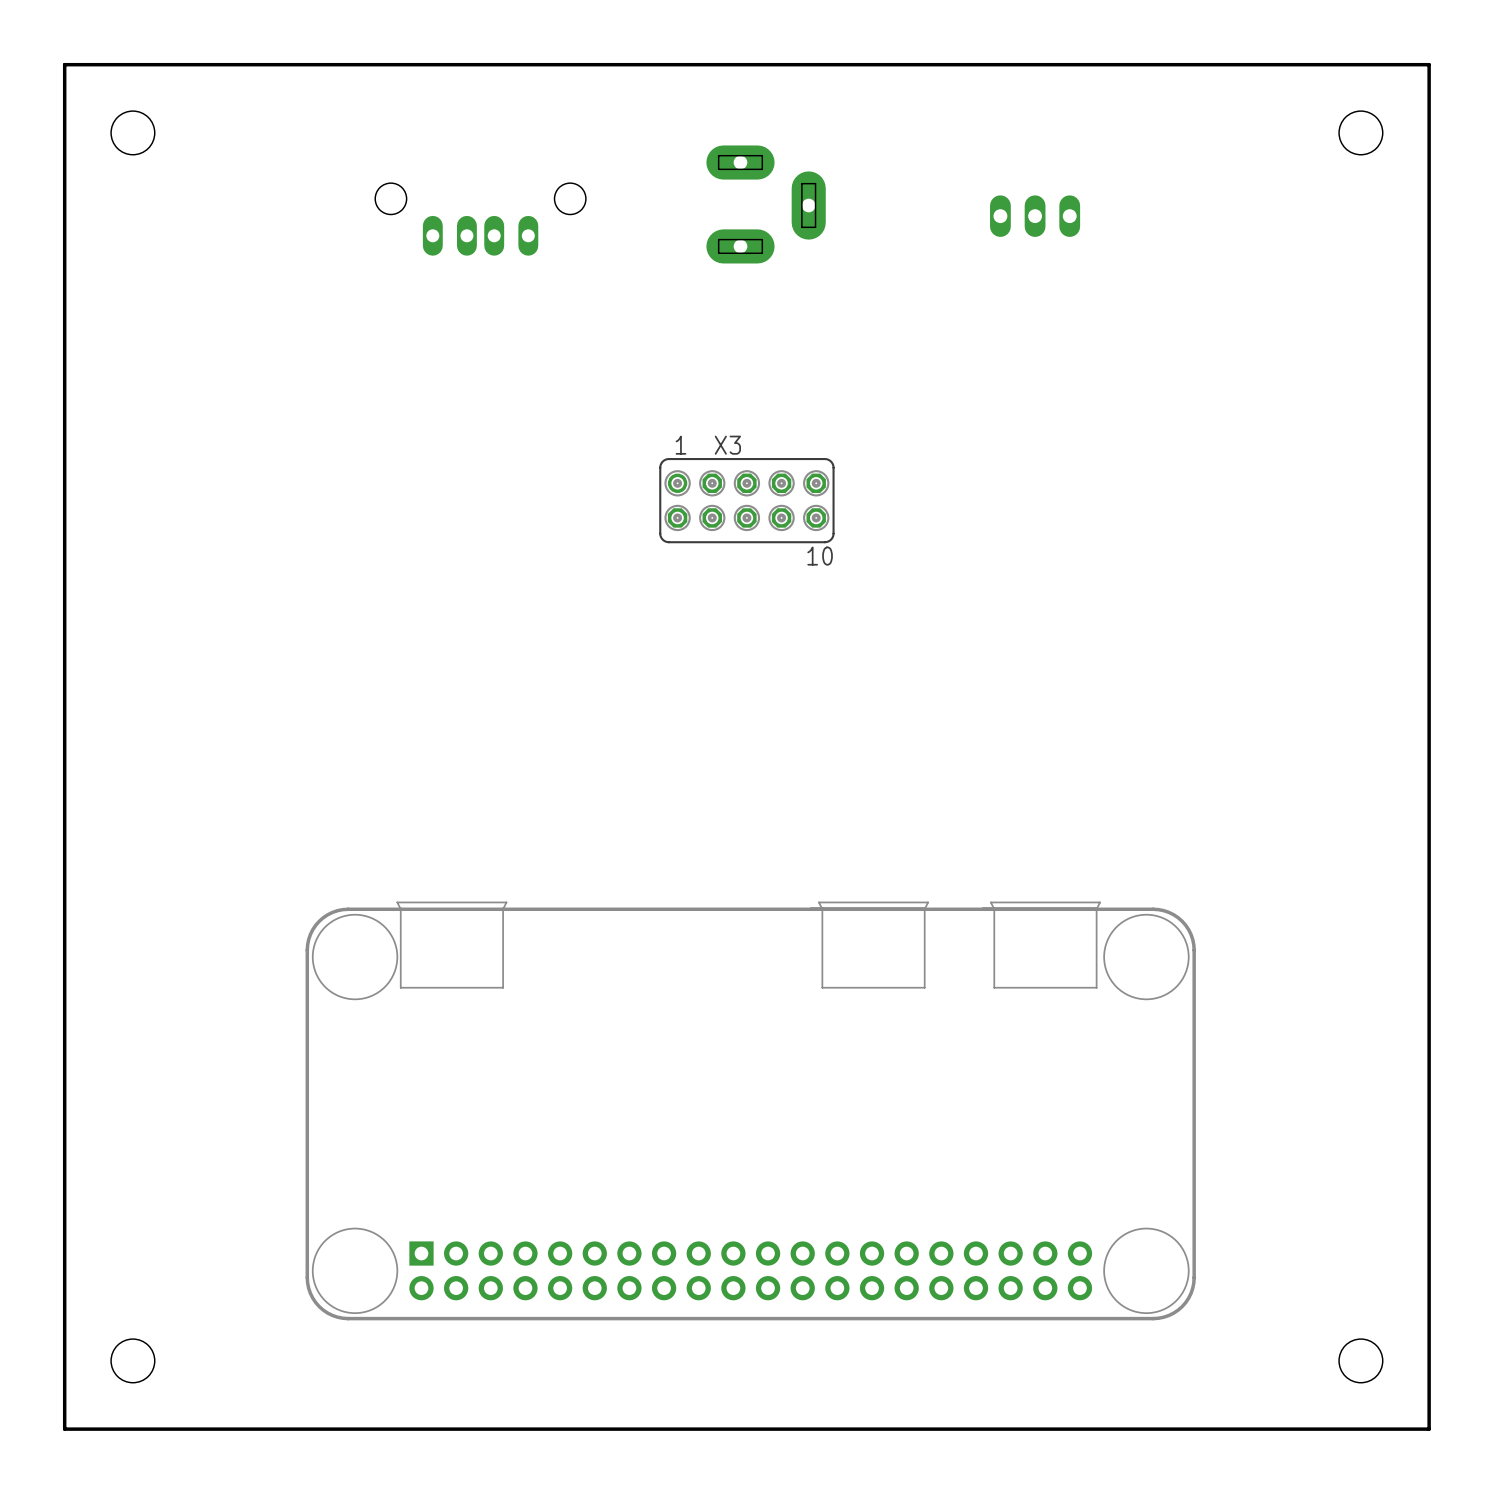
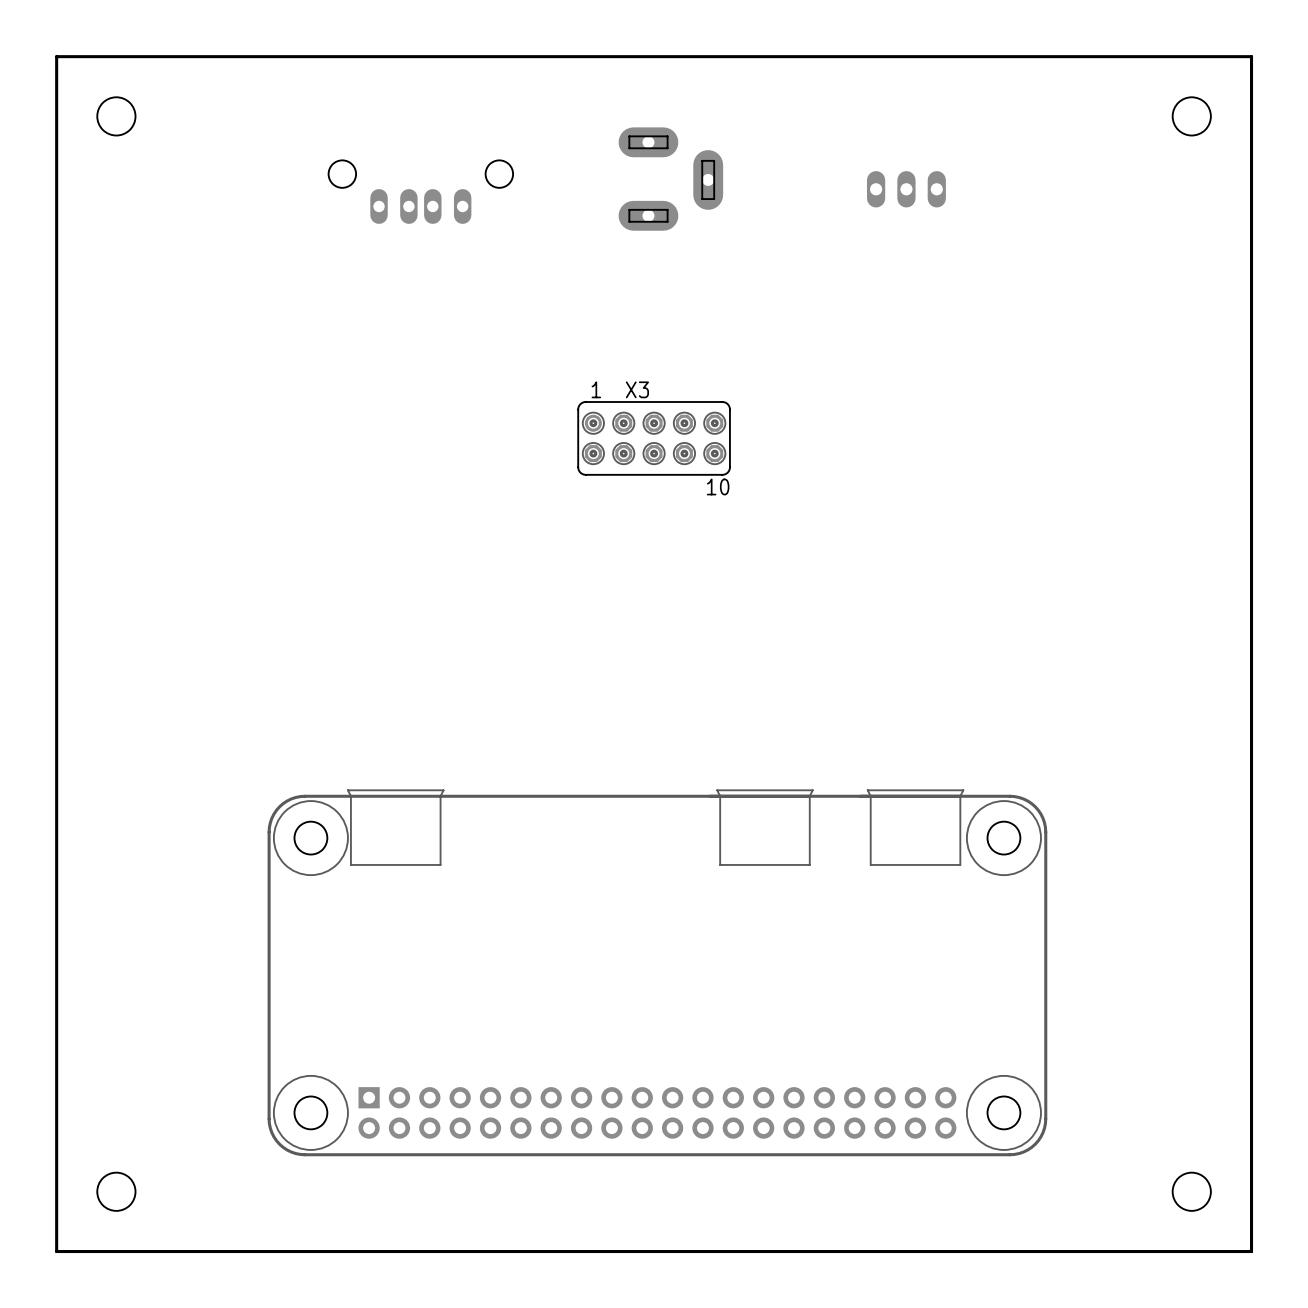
part footprint: [305, 901, 1196, 1321] -> [267, 789, 1048, 1157]

